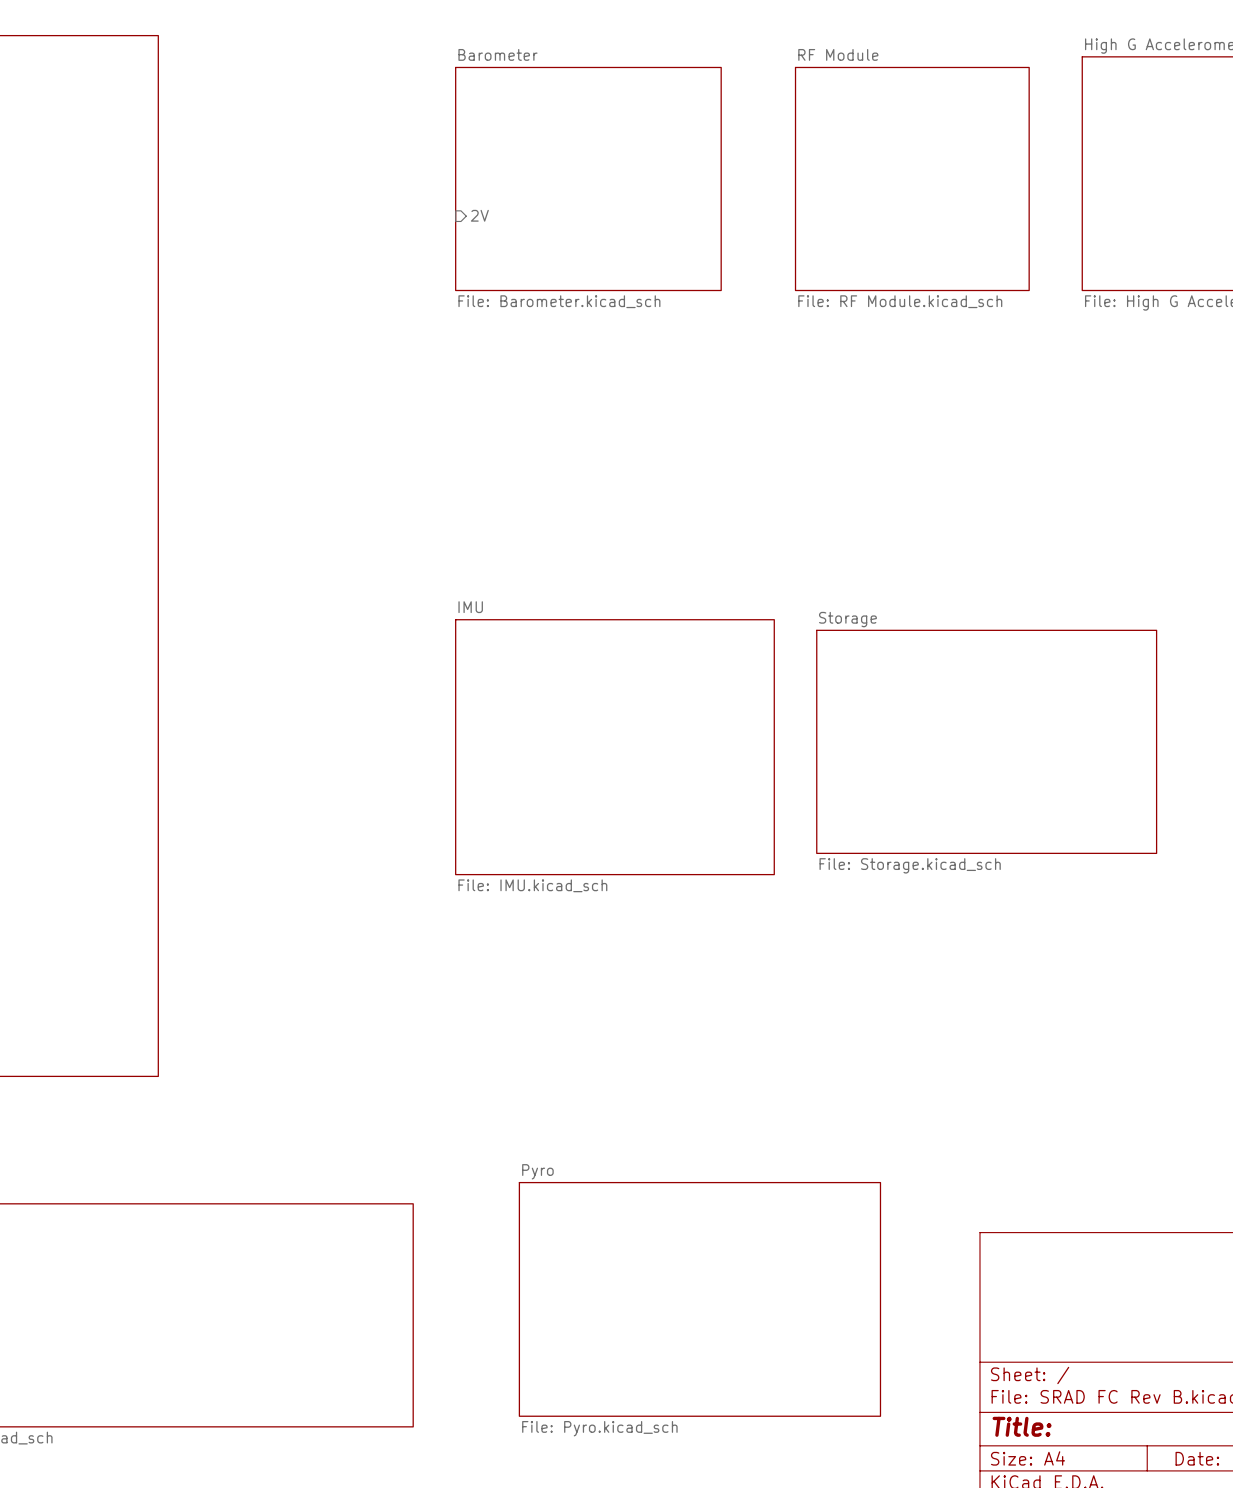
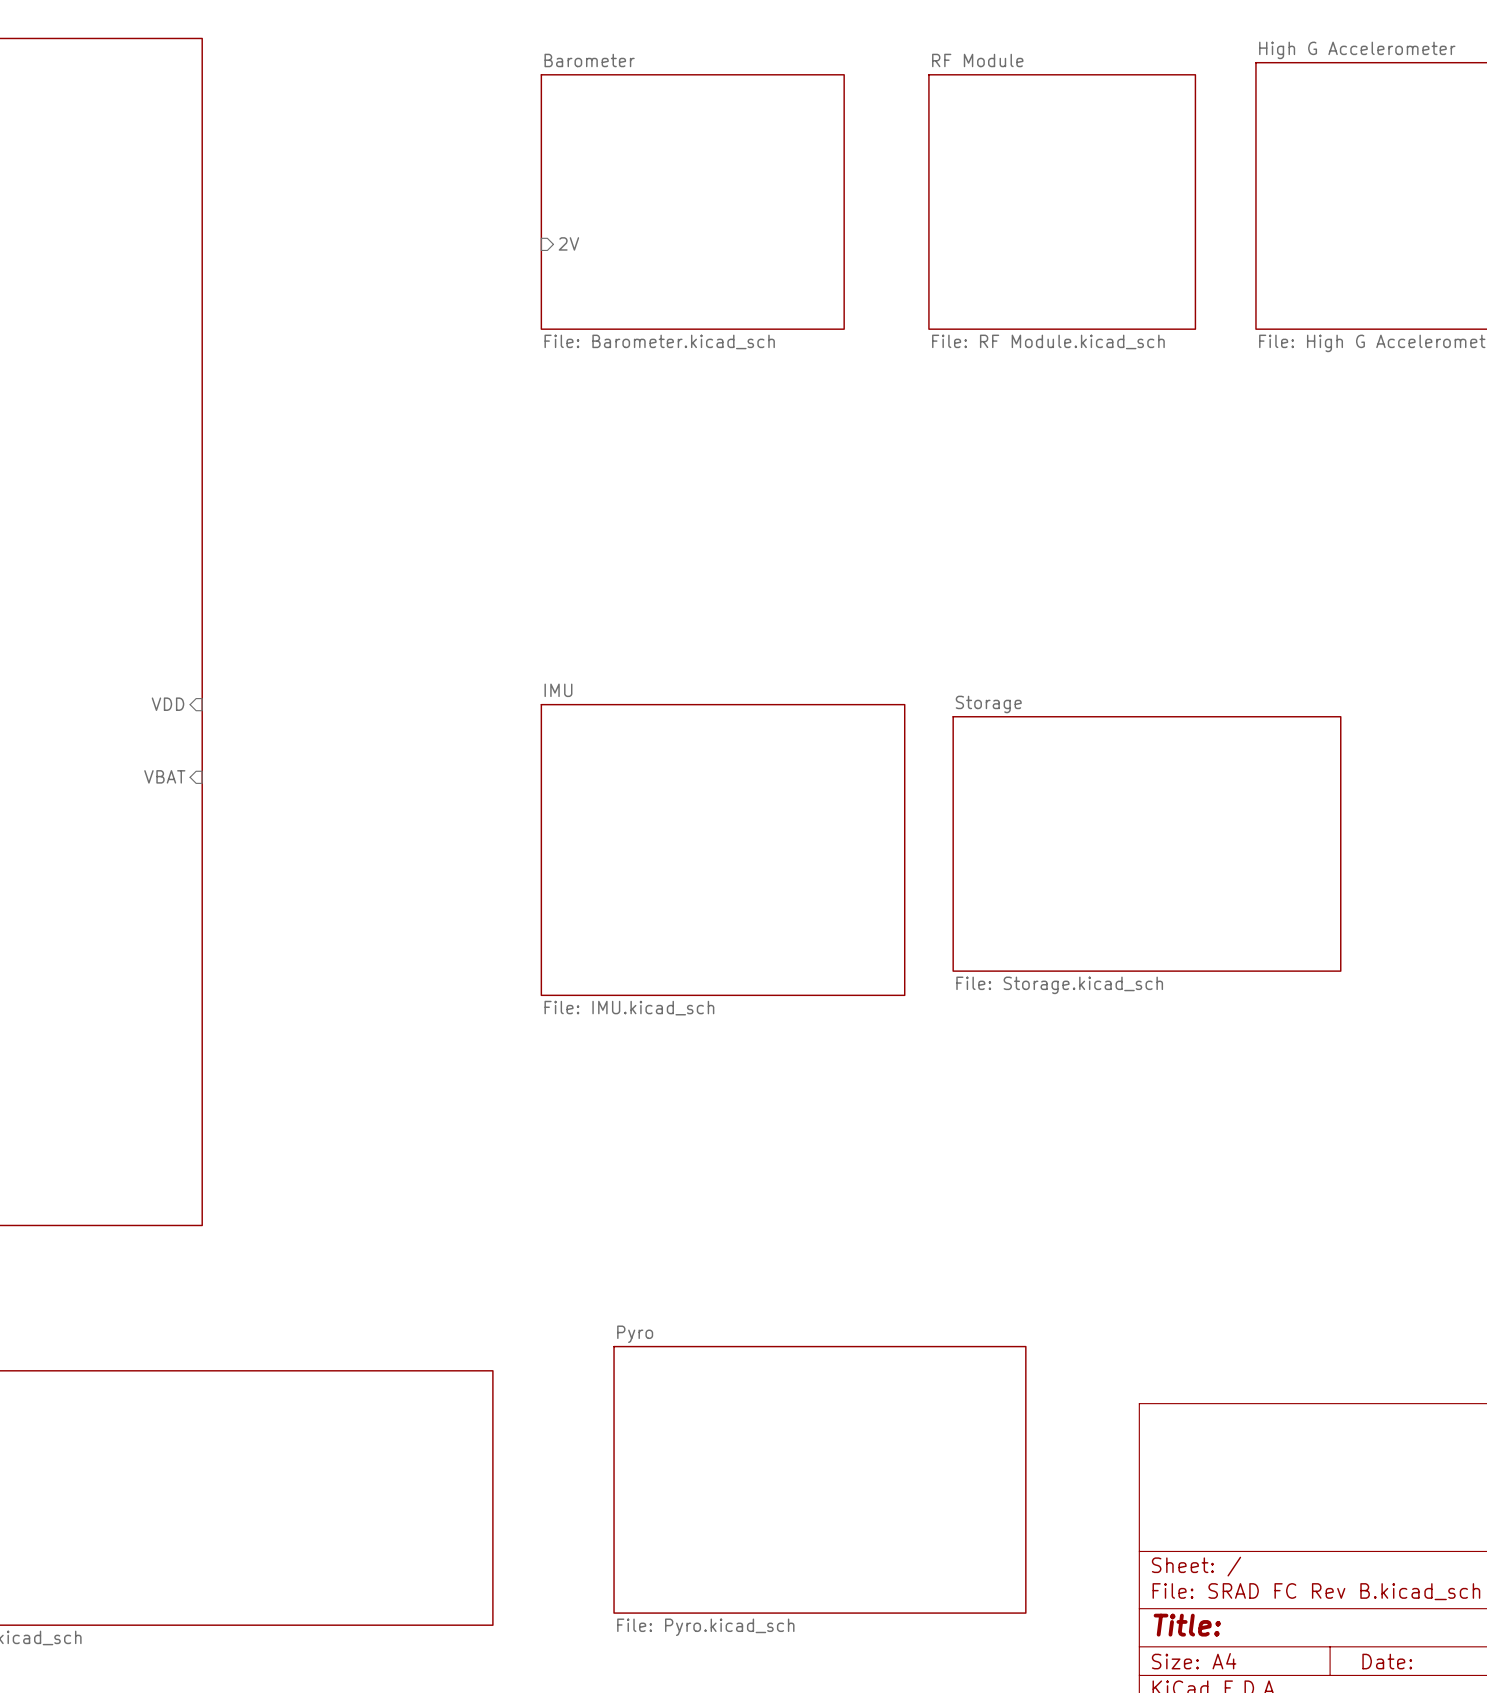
sheet pin: none -> VDD (167, 704)
sheet pin: none -> VBAT (164, 776)

